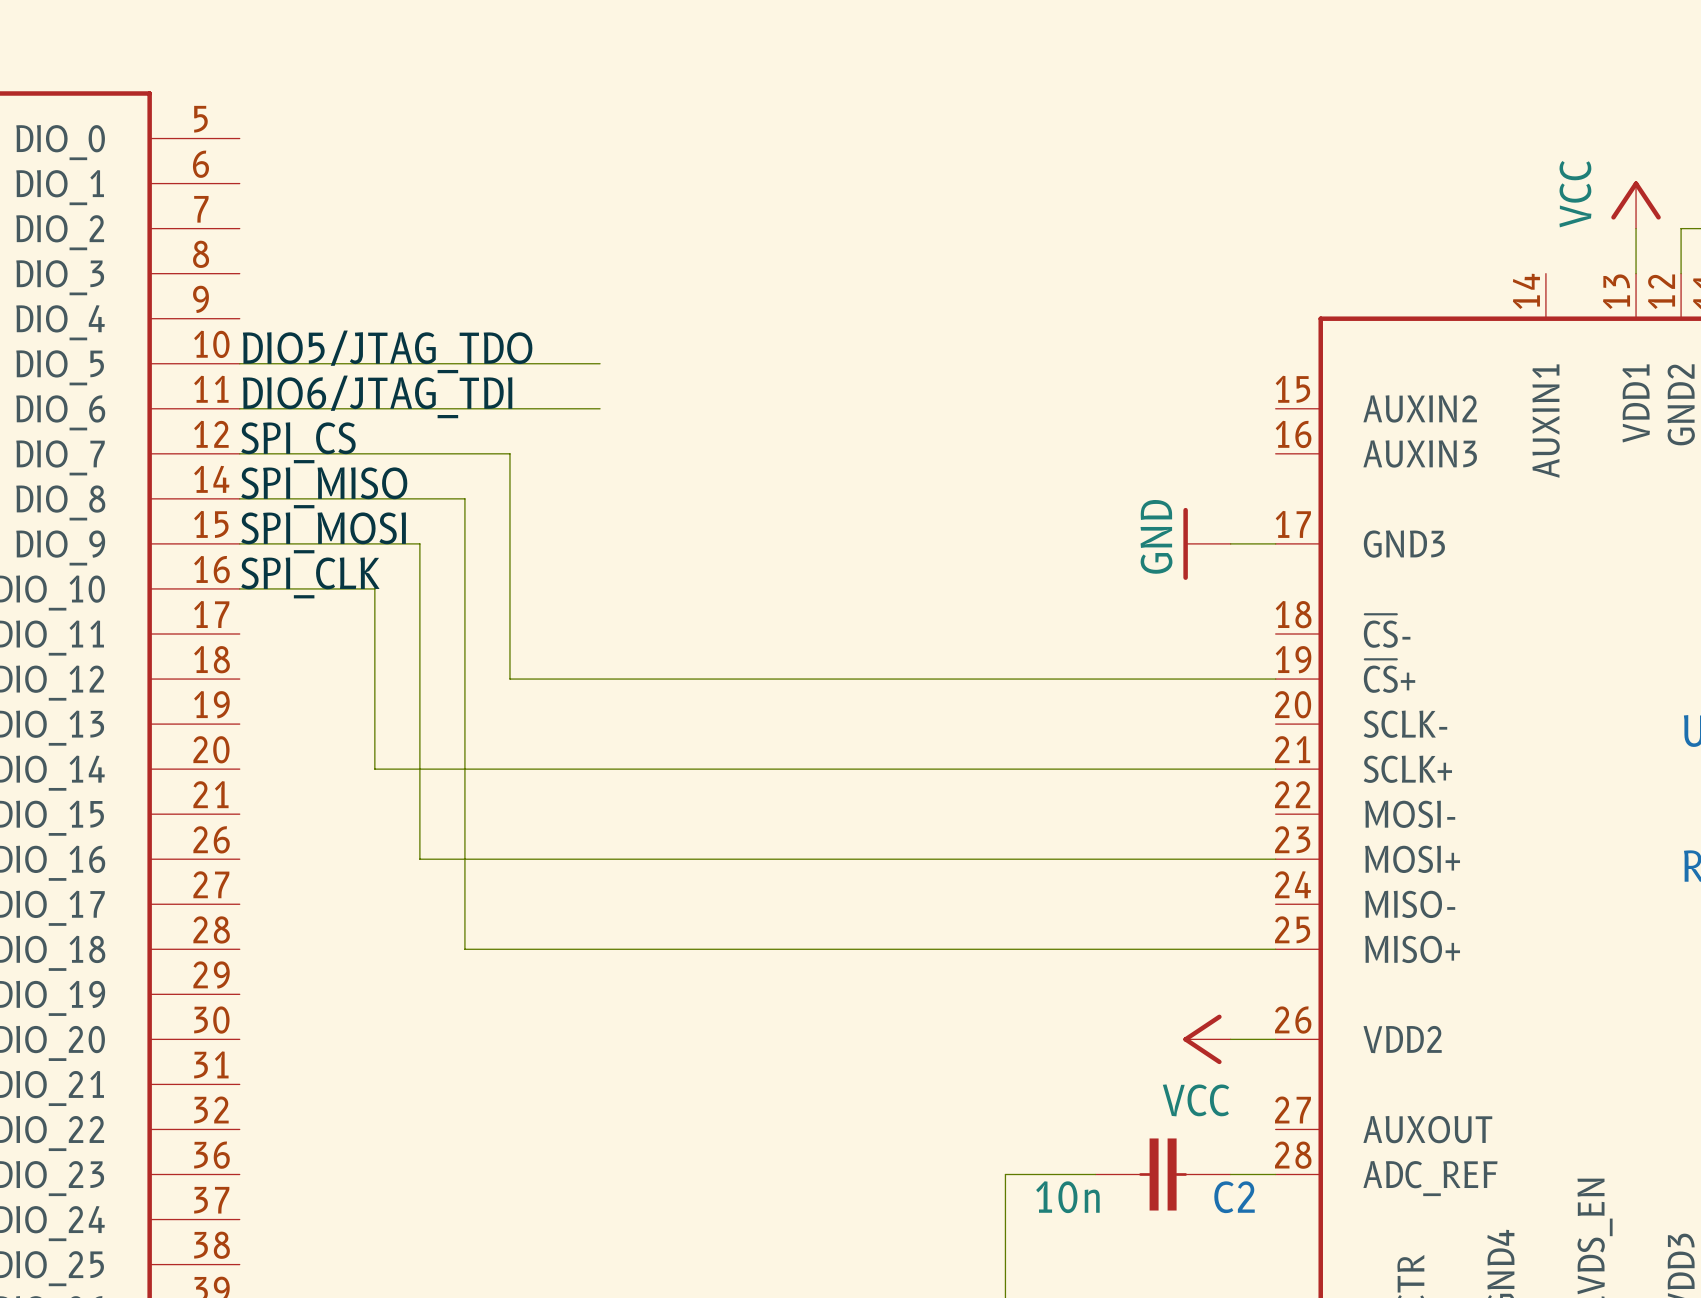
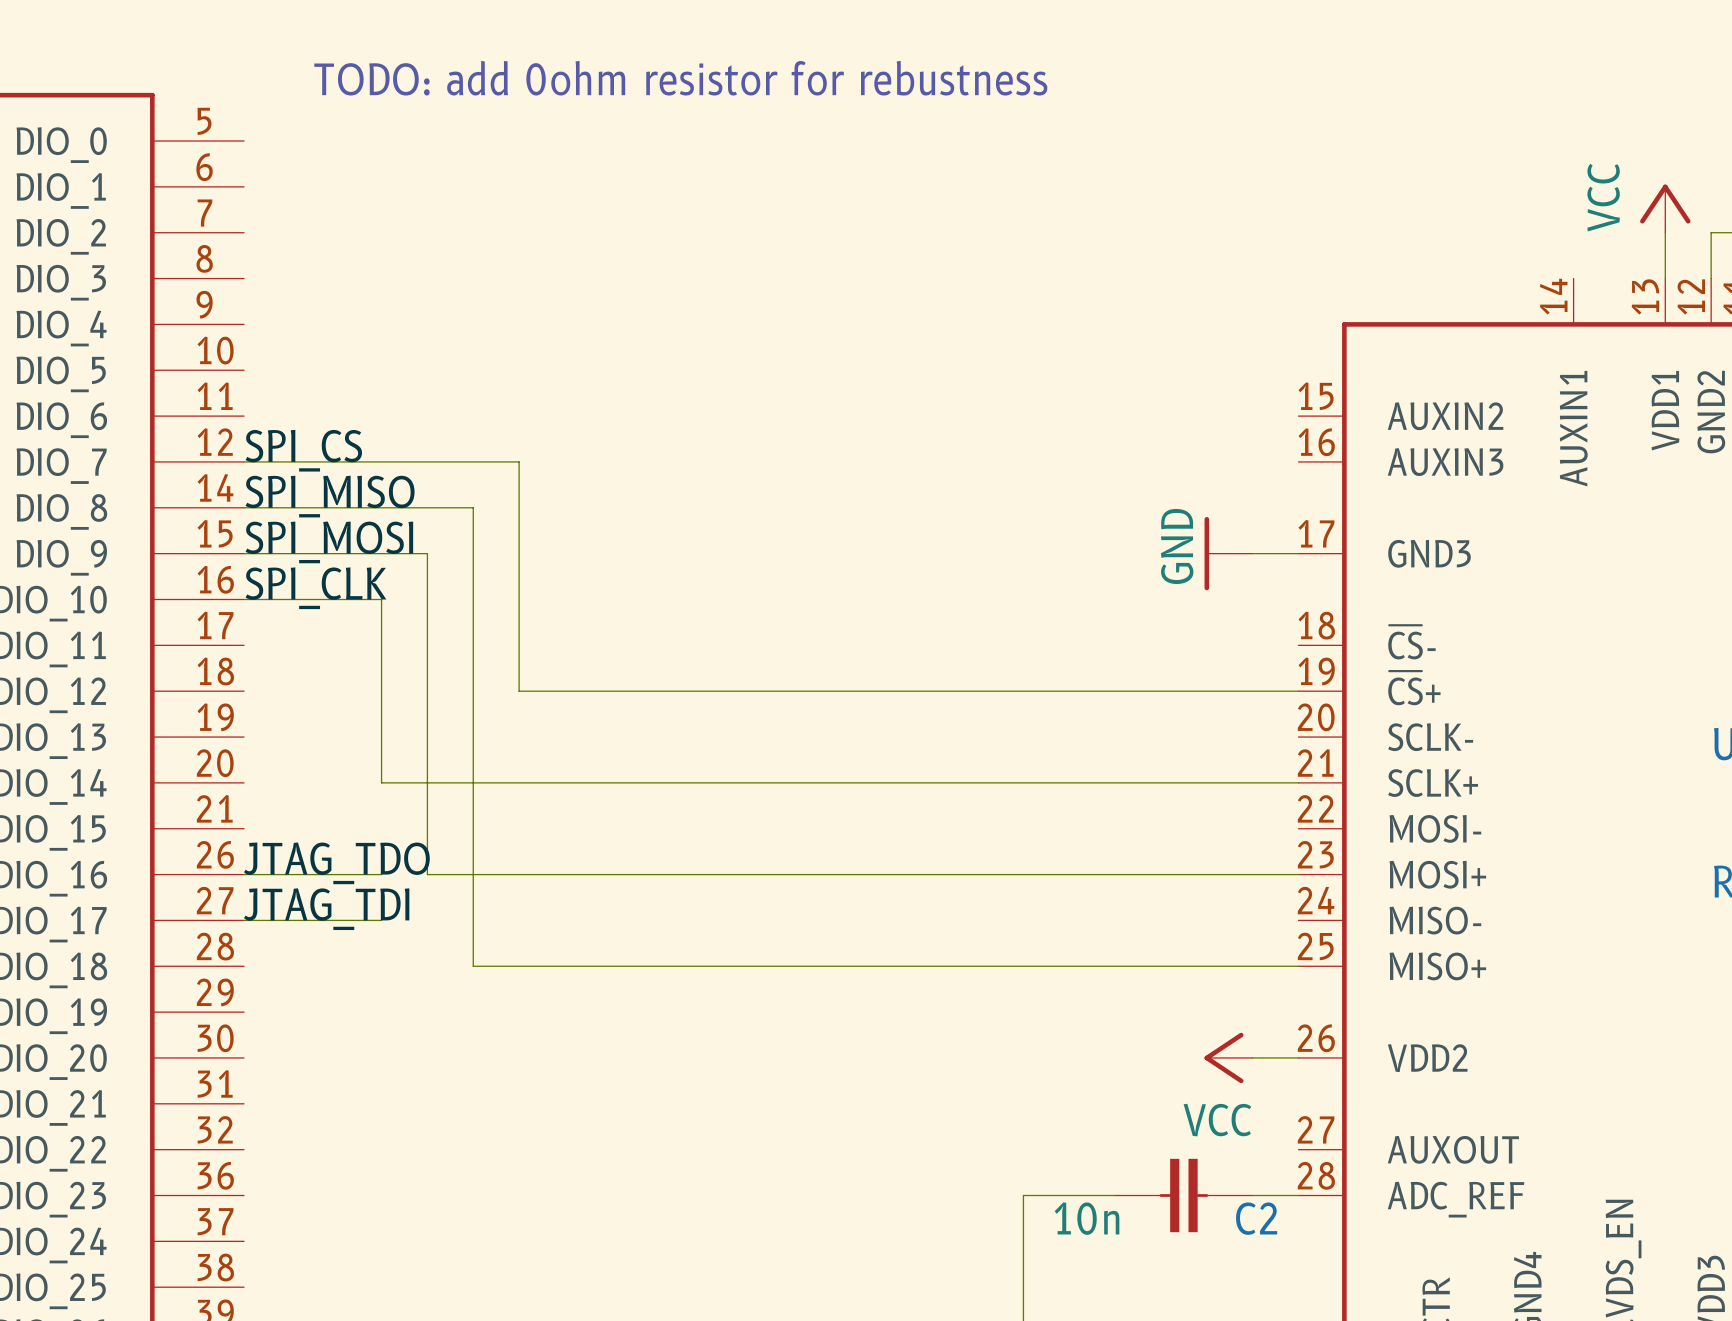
text: none -> TODO: add 0ohm resistor for rebustness (680, 78)
label: DIO5/JTAG_TDO (387, 351) -> none
wire: (239, 363) (600, 363) -> none
label: DIO6/JTAG_TDI (377, 396) -> none
wire: (239, 408) (600, 408) -> none
label: none -> JTAG_TDO (336, 863)
wire: none -> (244, 874) (381, 874)
label: none -> JTAG_TDI (326, 909)
wire: none -> (244, 920) (381, 920)

